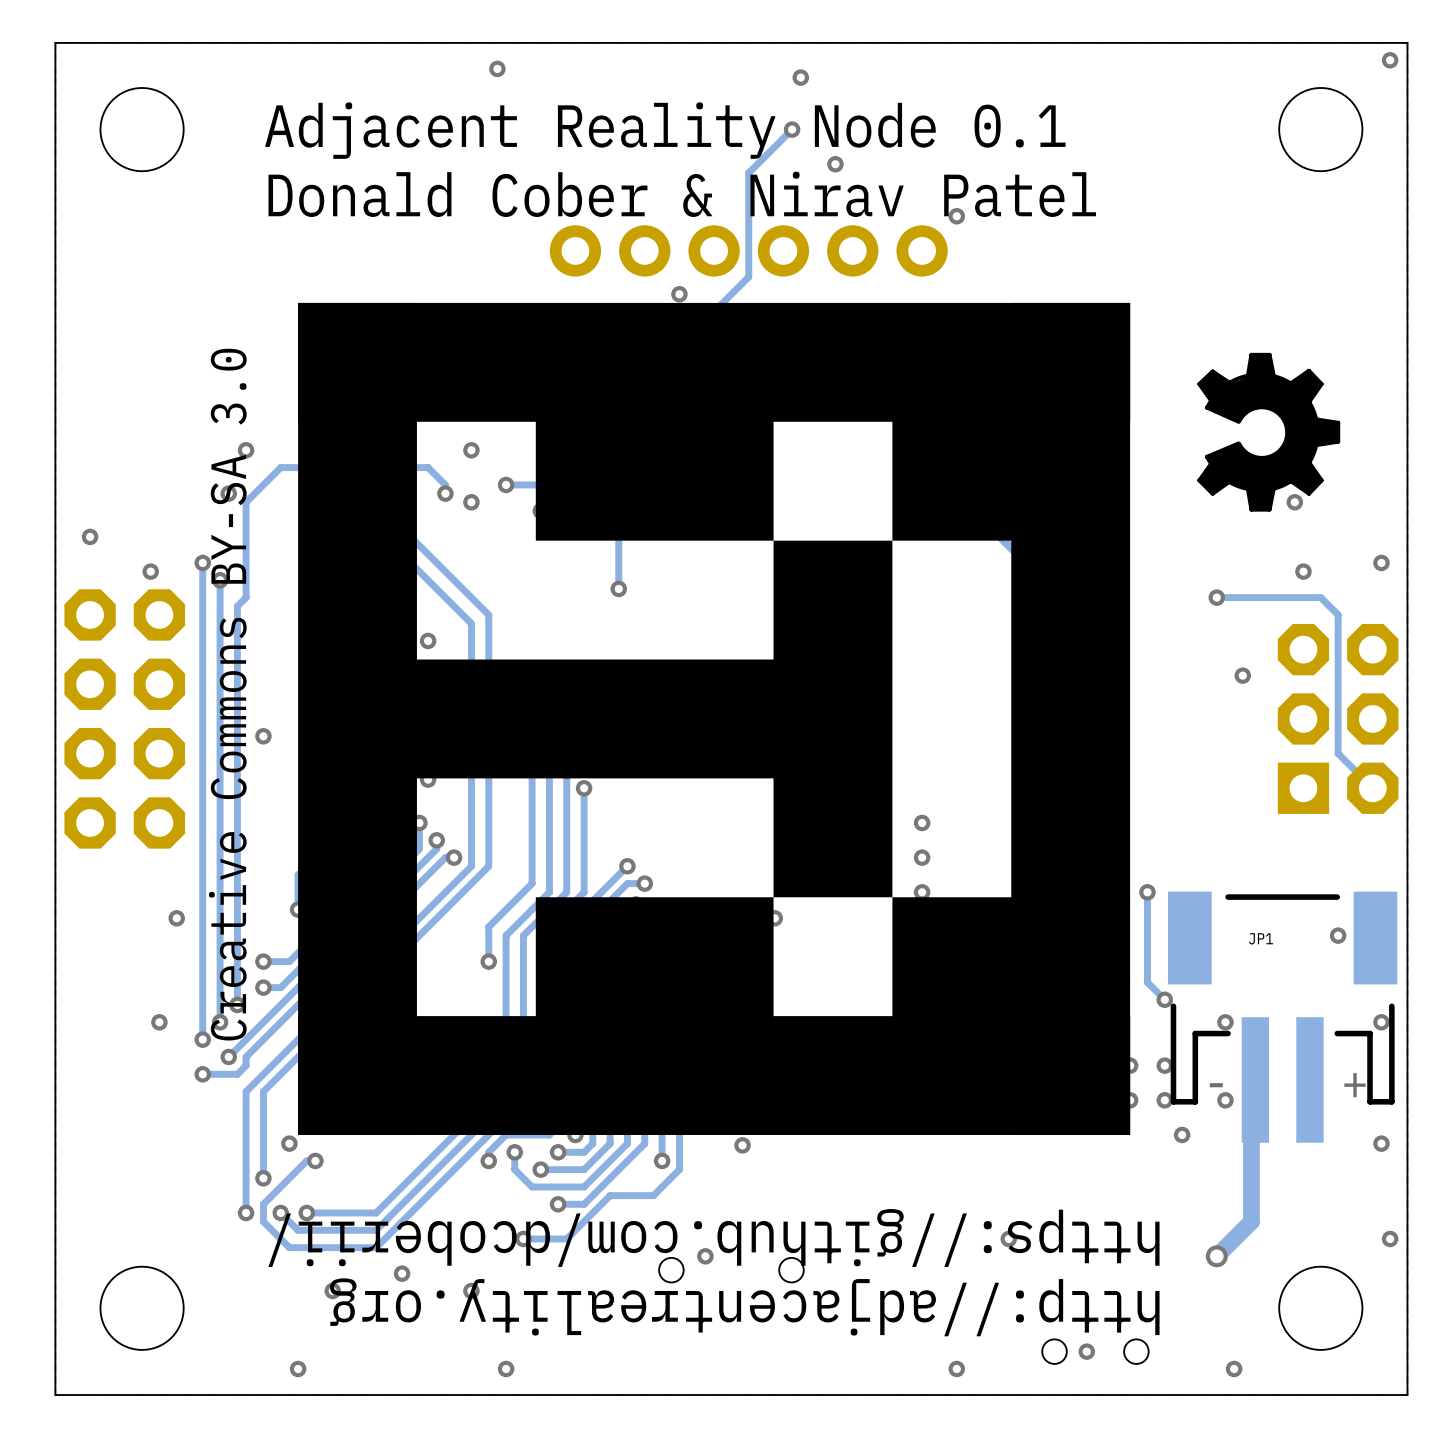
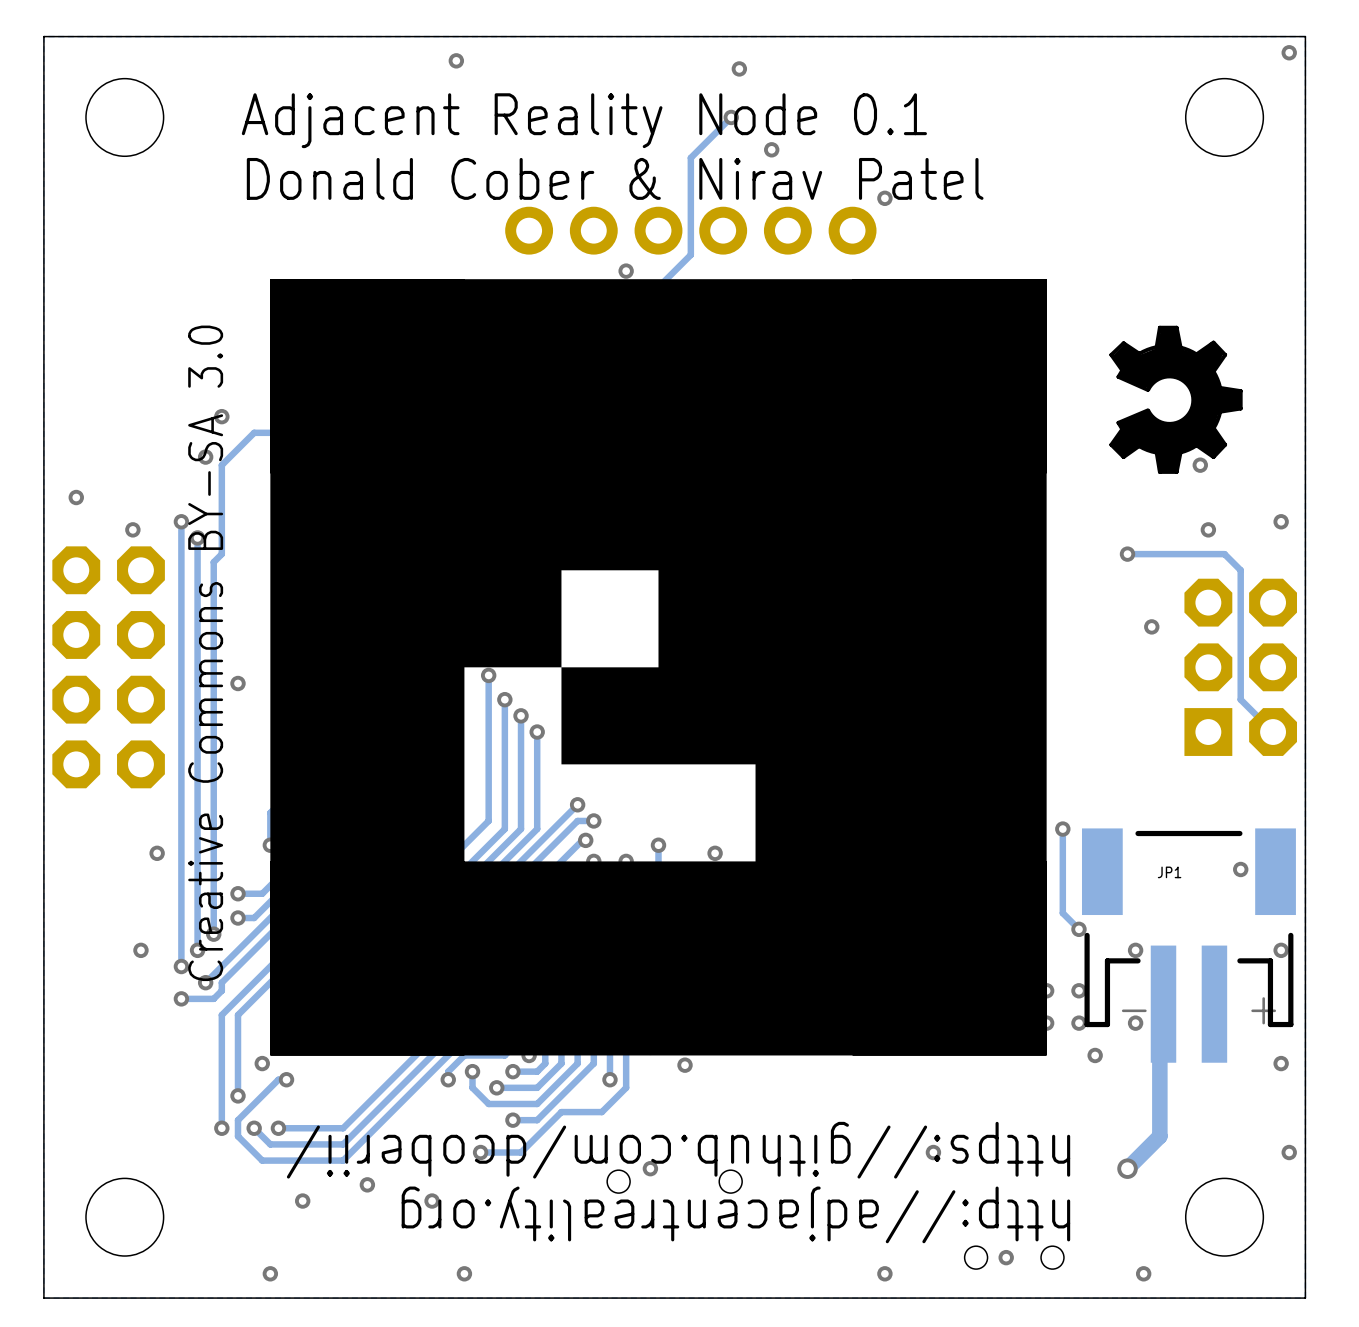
drawing: [298, 302, 1131, 1135] -> none
drawing: none -> [270, 279, 1047, 1056]

